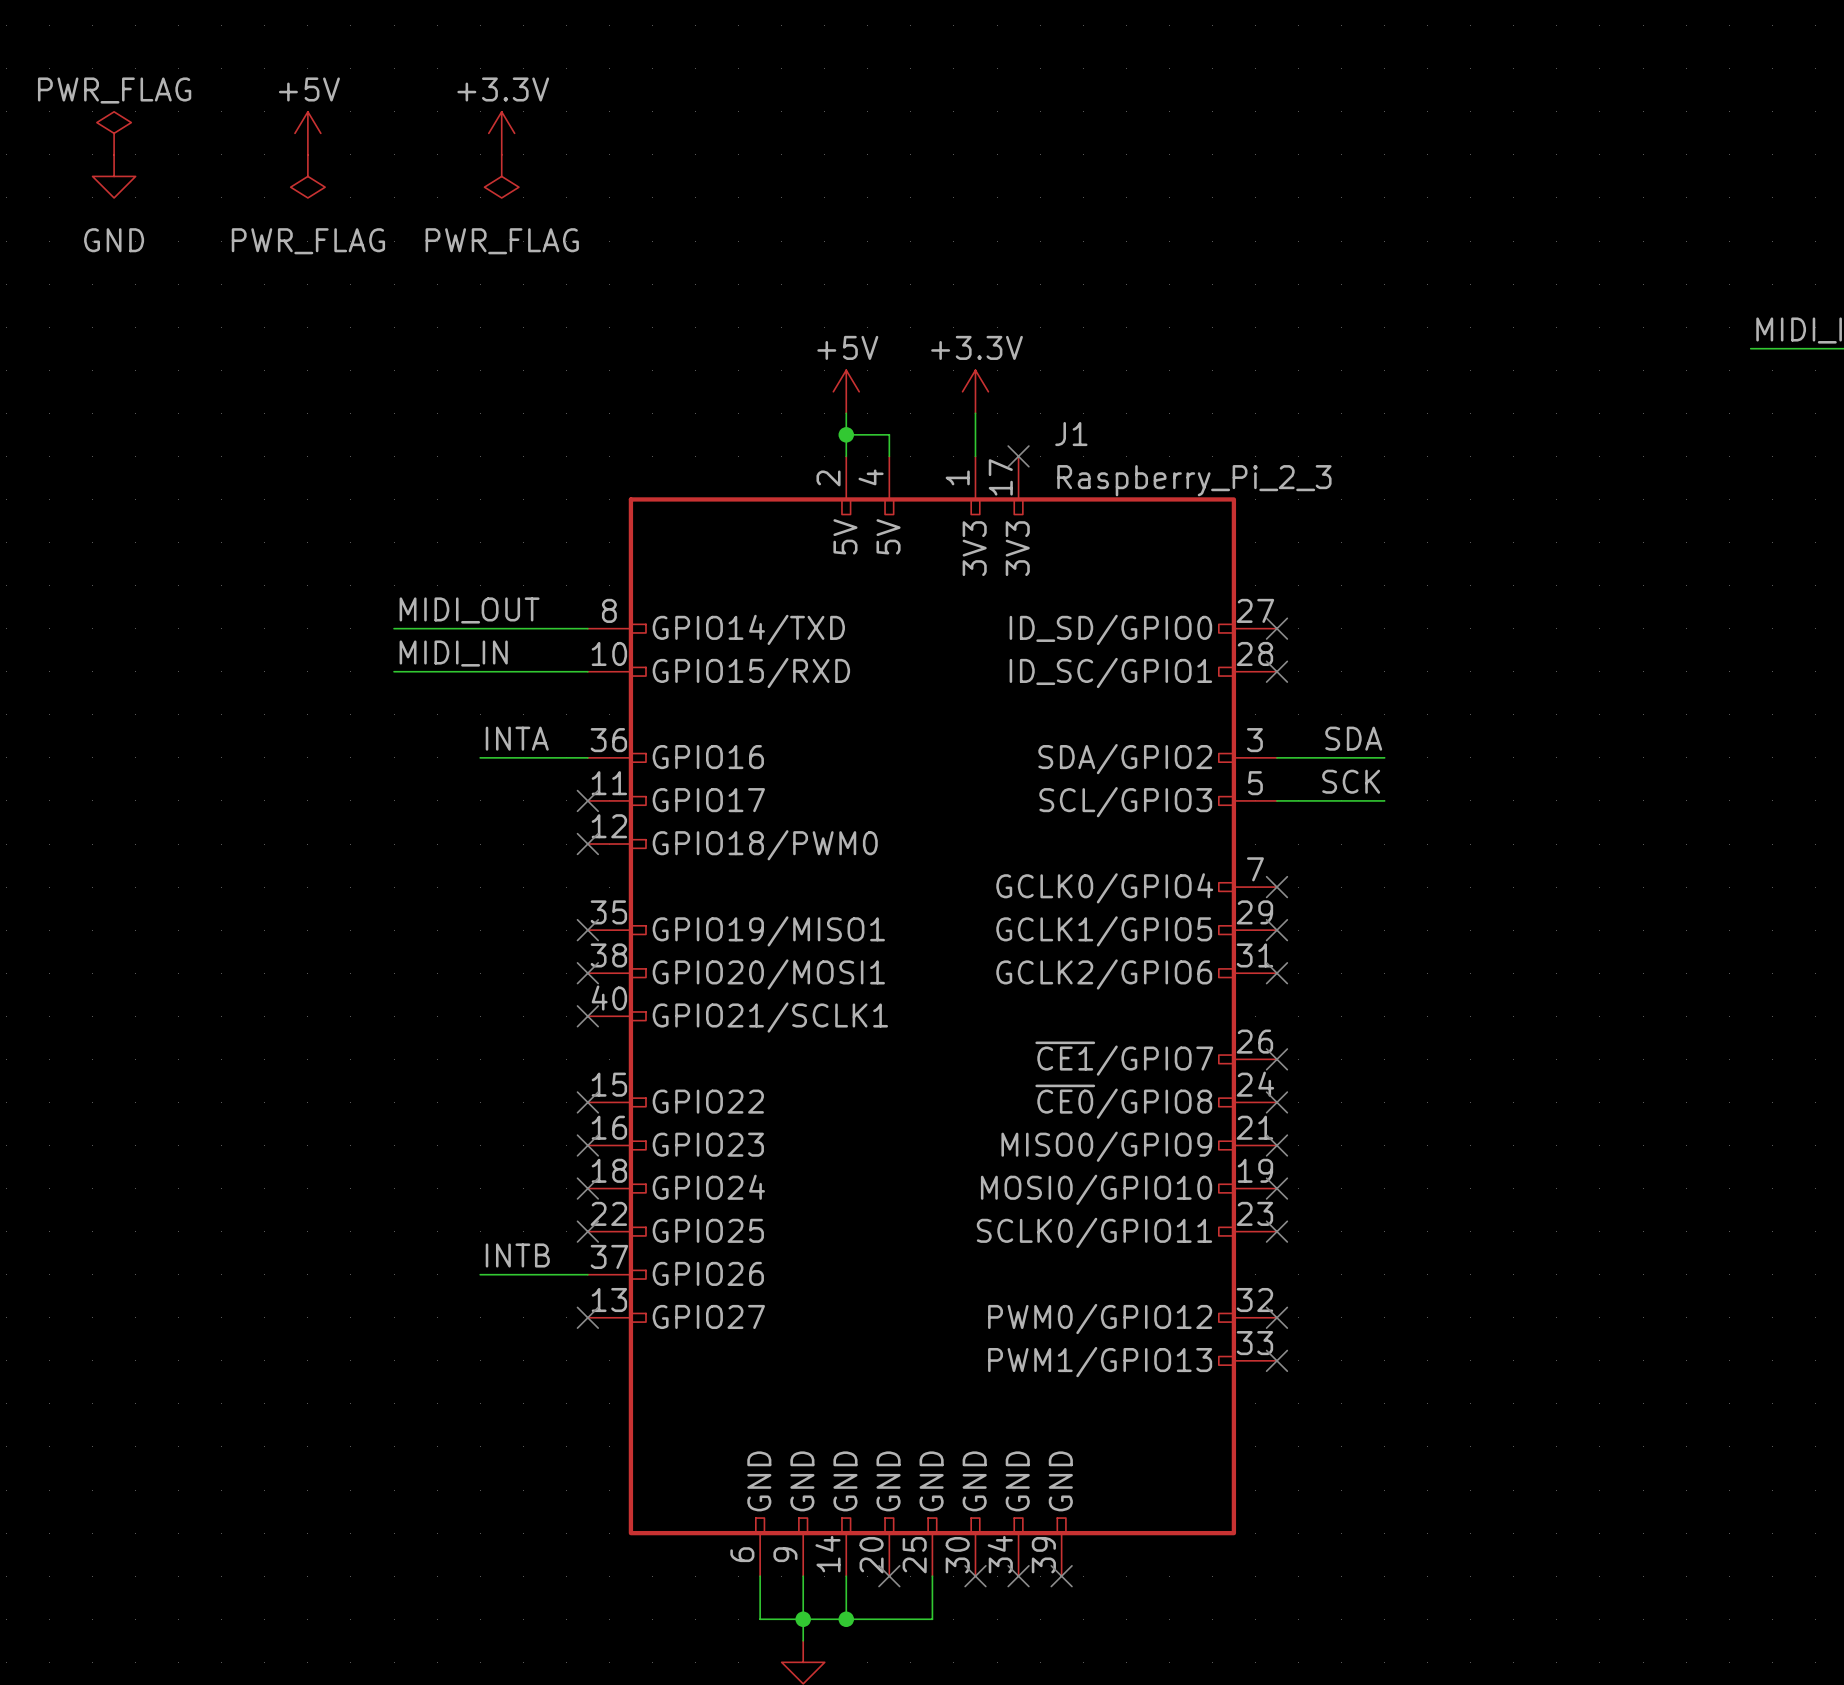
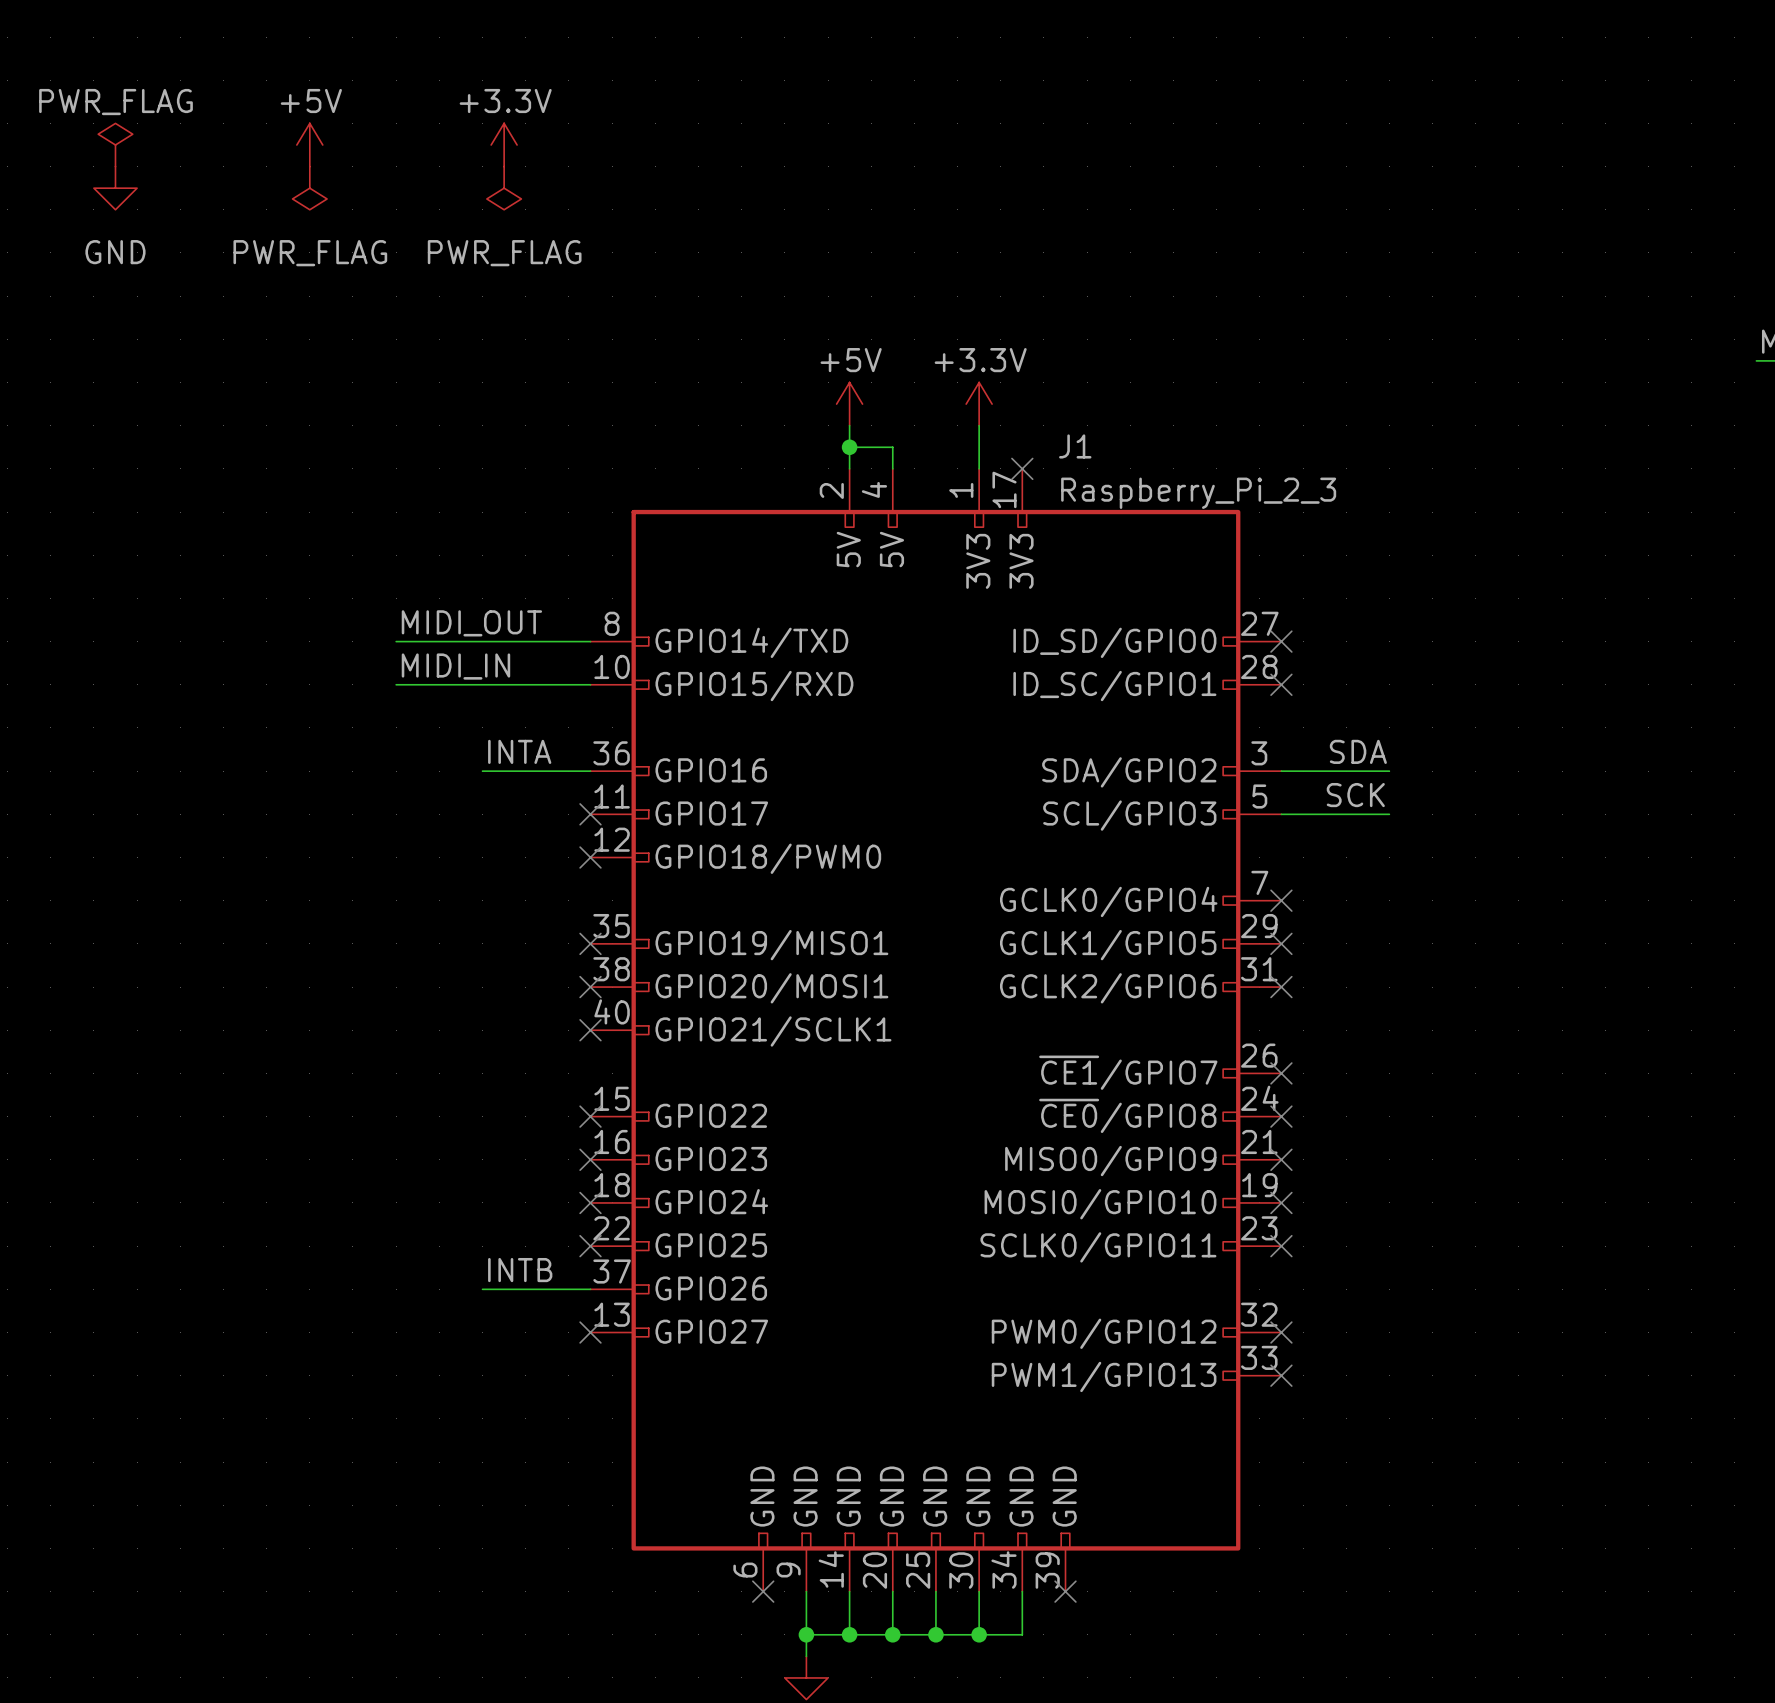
wire: (760, 1576) (760, 1619) (803, 1619) -> none
no-connect mark: none -> (763, 1591)
wire: none -> (892, 1591) (892, 1634)
no-connect mark: (889, 1576) -> none
wire: none -> (979, 1591) (979, 1634)
no-connect mark: (975, 1576) -> none
wire: none -> (1022, 1591) (1022, 1634) (935, 1634)
no-connect mark: (1018, 1576) -> none
junction: none -> (892, 1634)
junction: none -> (935, 1634)
junction: none -> (979, 1634)

